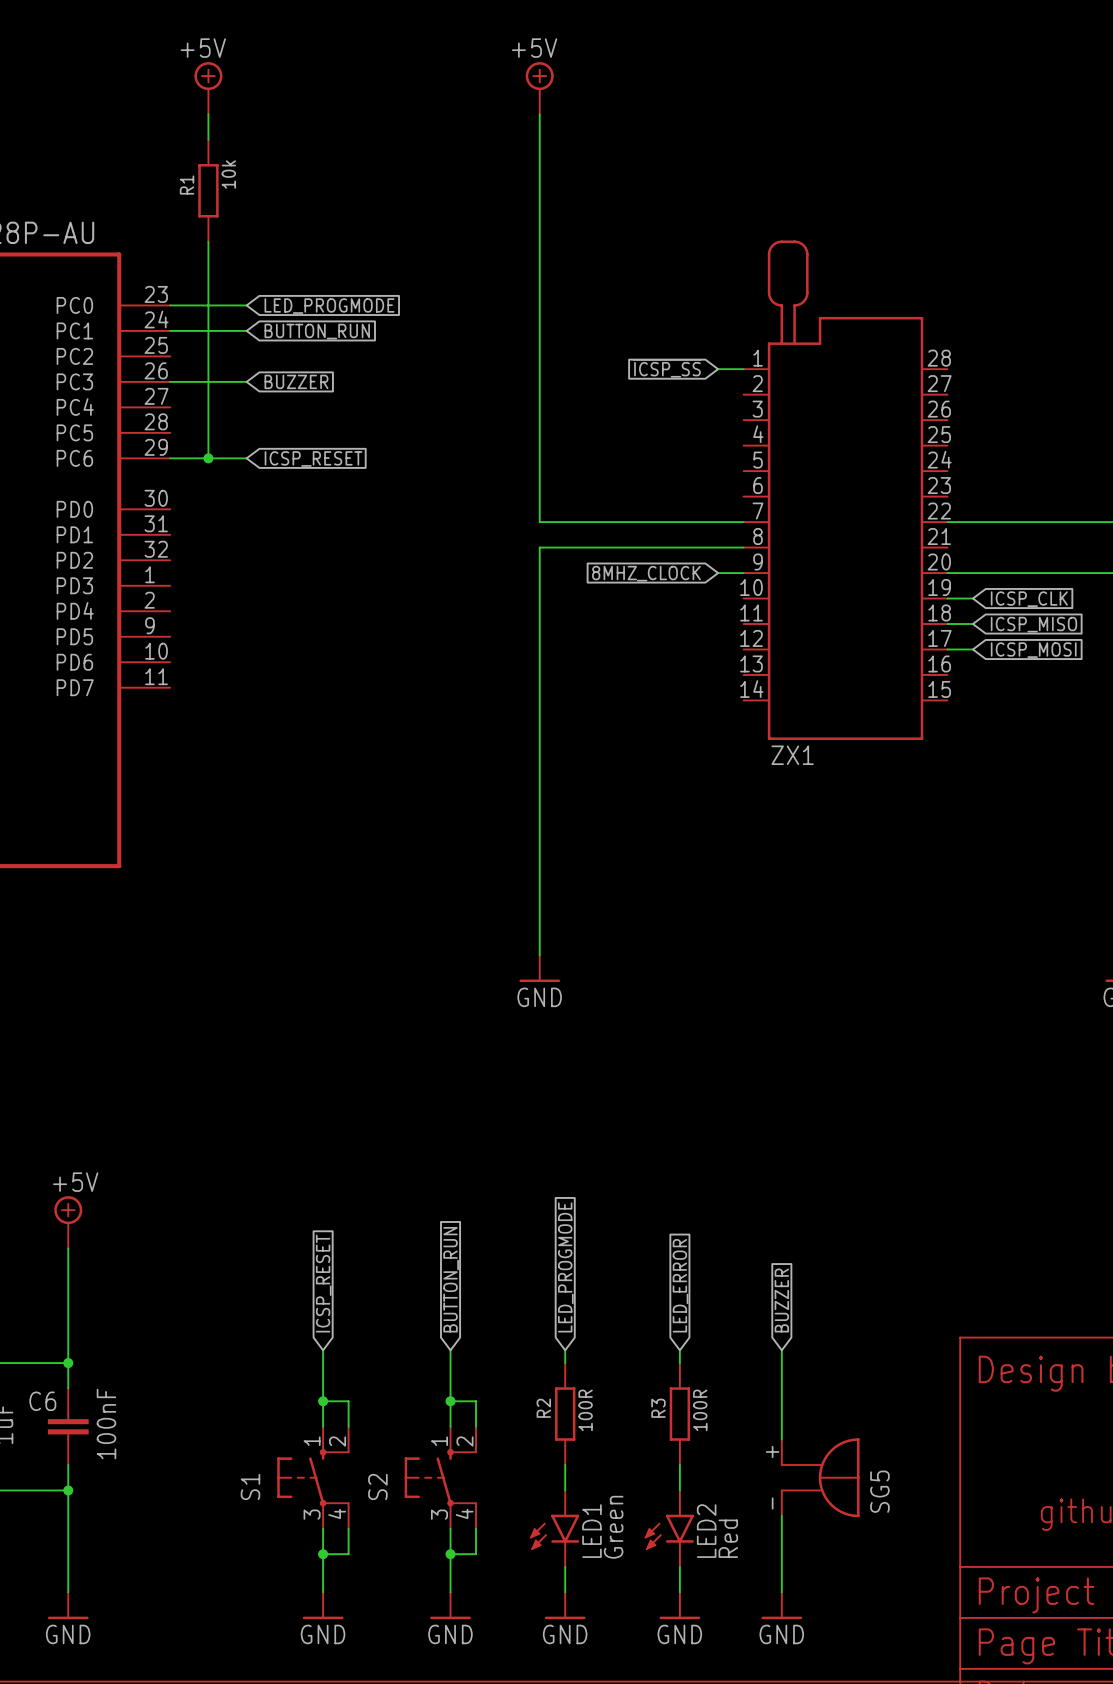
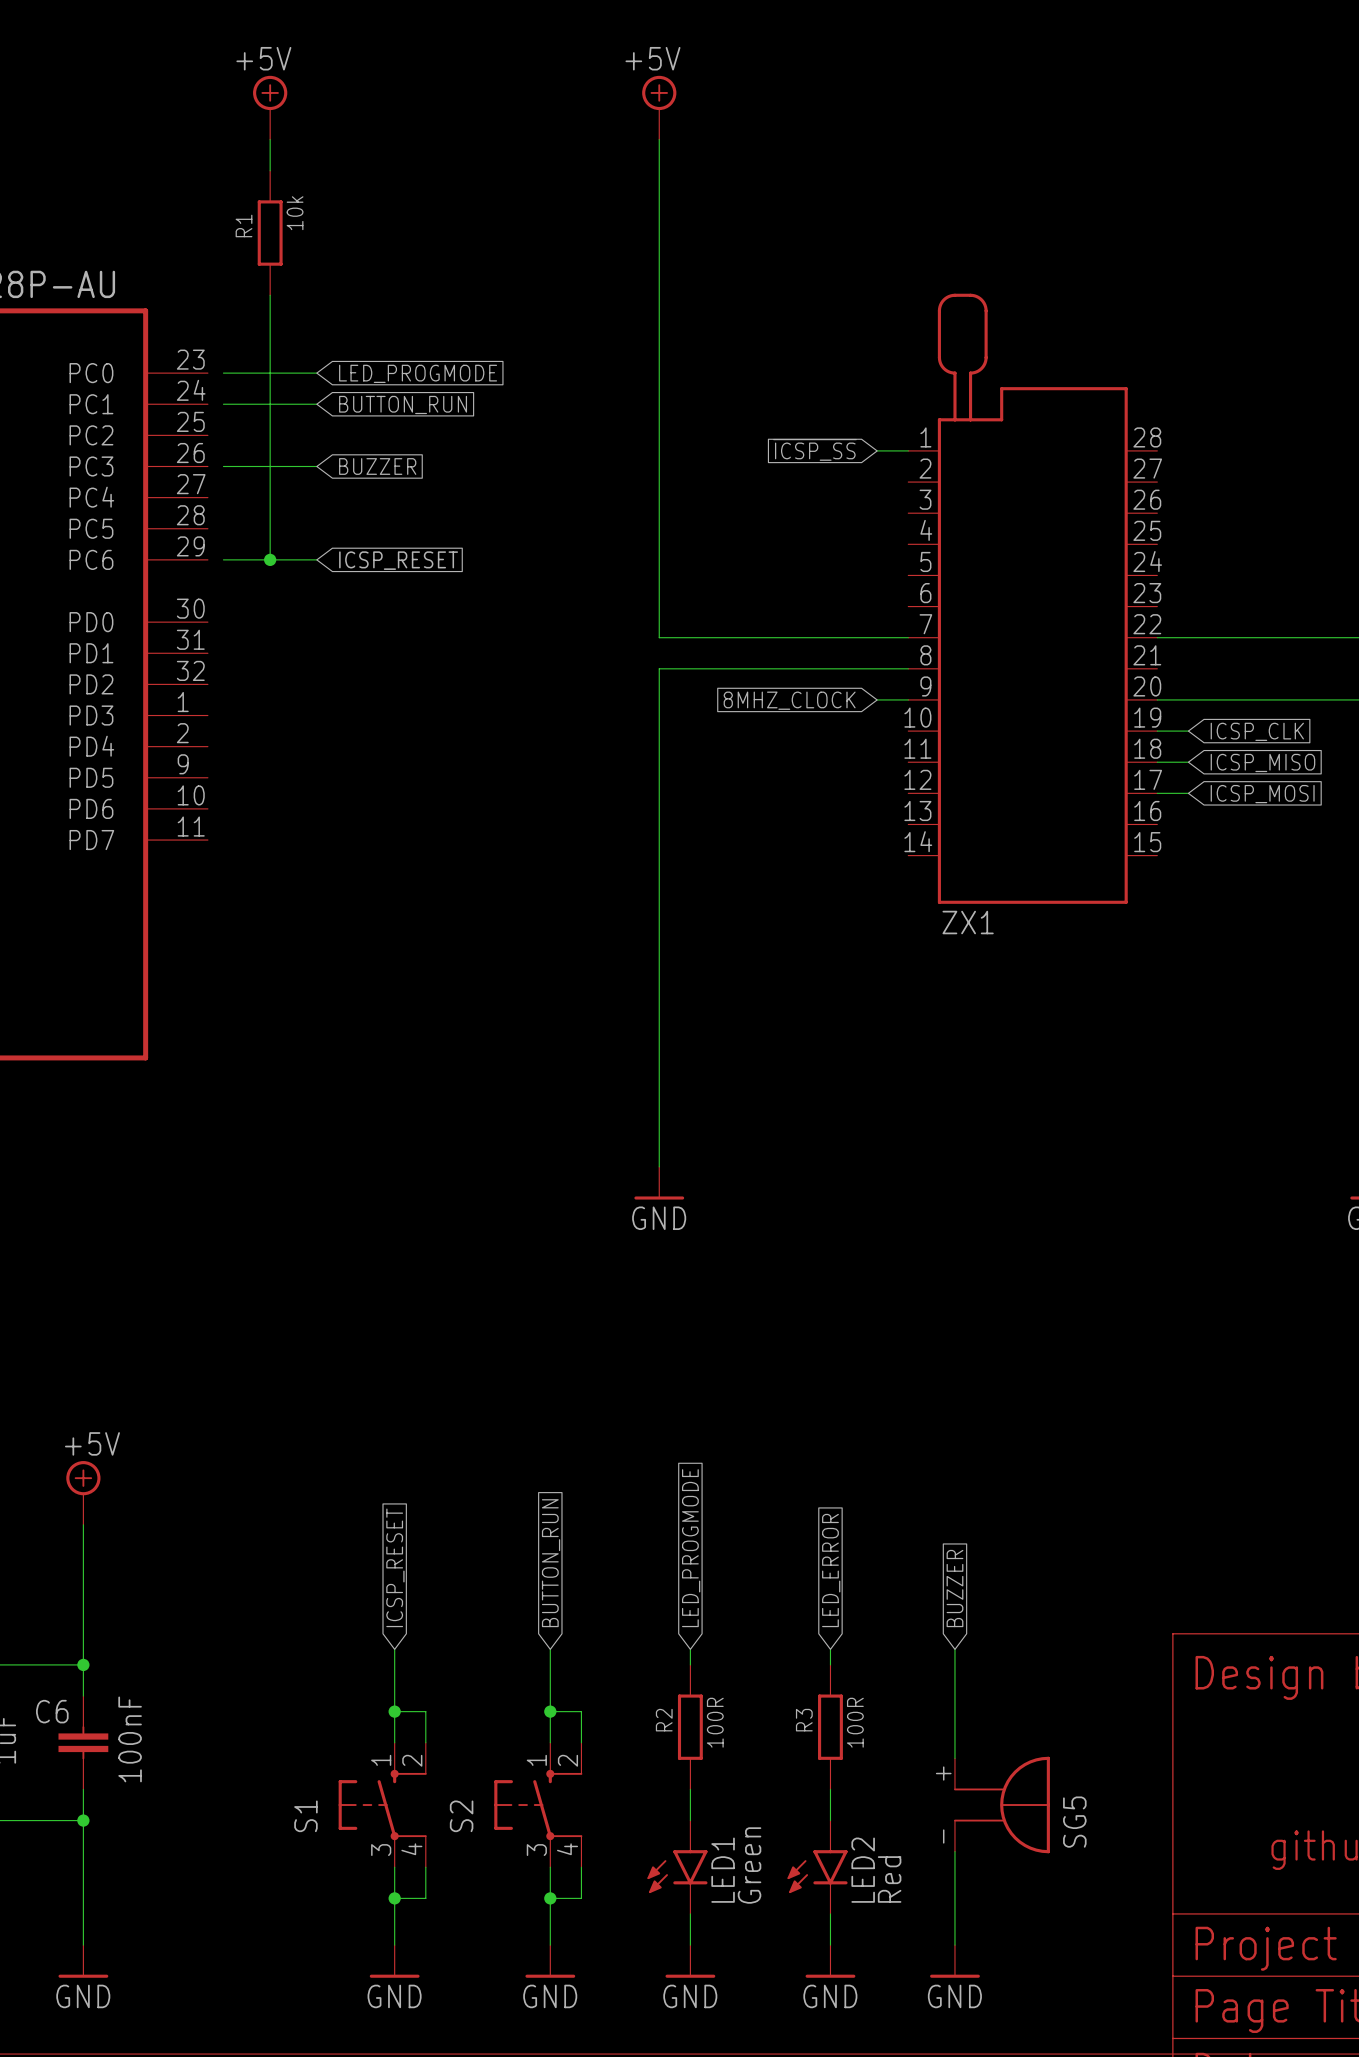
power symbol position: +5V (208, 88) -> +5V (270, 107)
wire: (208, 114) (208, 139) -> (270, 139) (270, 170)
R1 position: (208, 190) -> (270, 233)
wire: (208, 241) (208, 458) -> (270, 295) (270, 559)
wire: (170, 305) (182, 305) -> (301, 373) (316, 373)
global label position: LED_PROGMODE (329, 306) -> LED_PROGMODE (418, 373)
wire: (170, 330) (182, 330) -> (301, 404) (316, 404)
global label position: BUTTON_RUN (317, 331) -> BUTTON_RUN (403, 404)
wire: (170, 381) (182, 381) -> (301, 466) (316, 466)
global label position: BUZZER (296, 381) -> BUZZER (377, 466)
wire: (170, 458) (182, 458) -> (301, 559) (316, 559)
junction position: (208, 458) -> (270, 559)
global label position: ICSP_RESET (313, 458) -> ICSP_RESET (398, 560)

